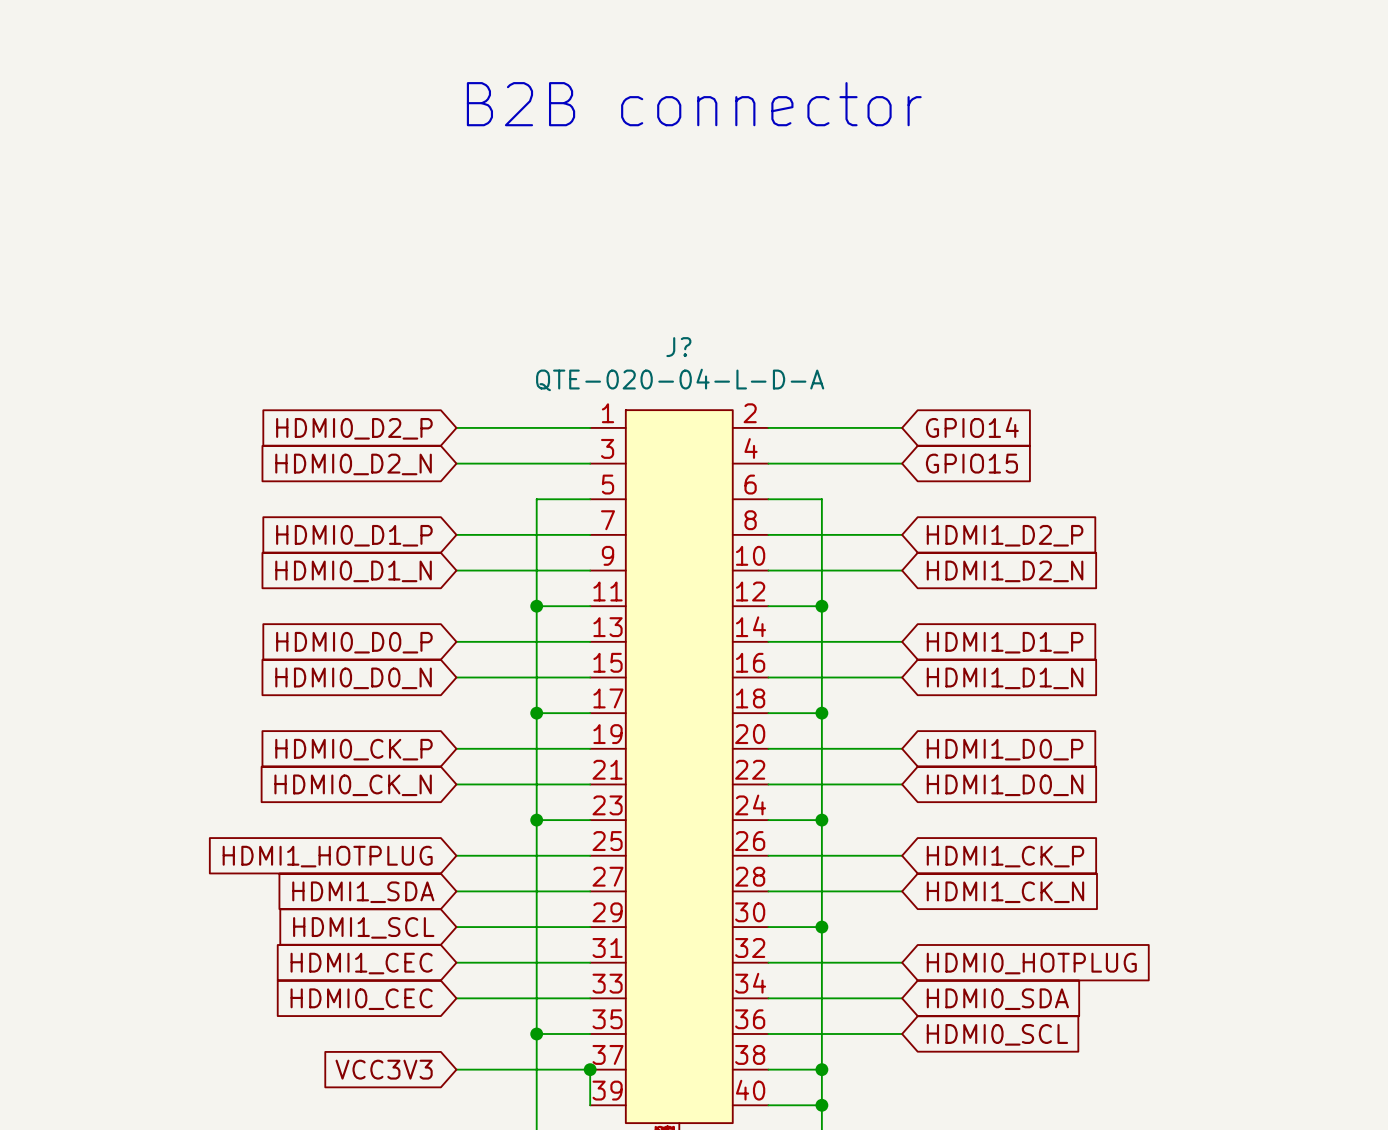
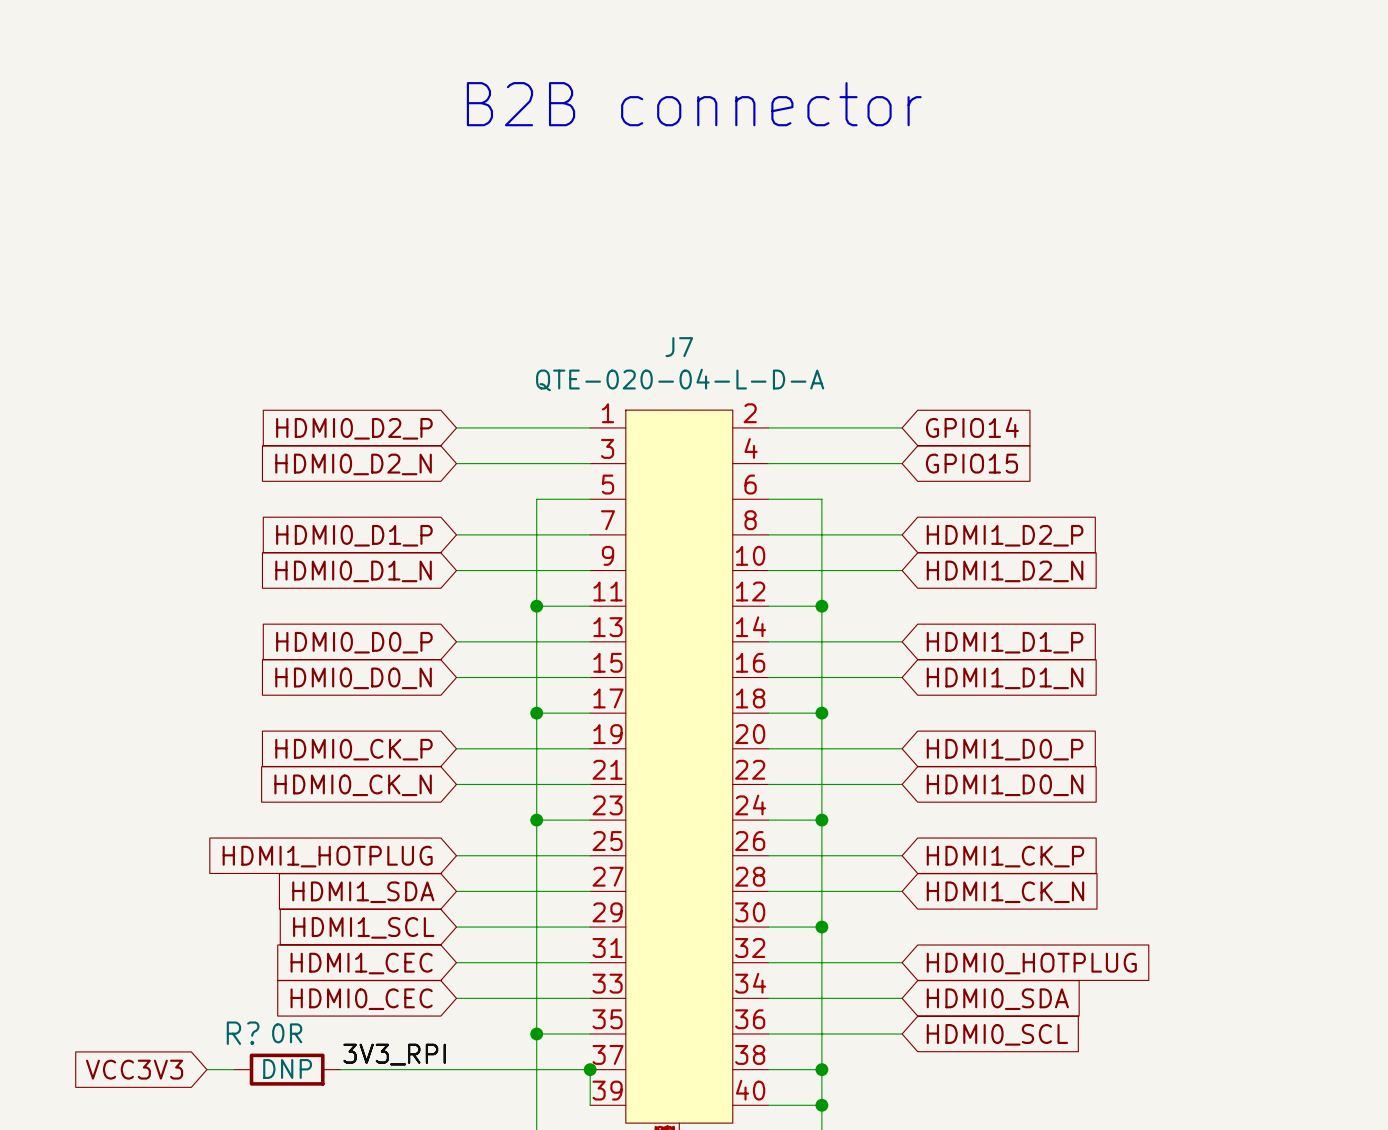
J? name: J? (678, 347) -> J7 (679, 347)
label: none -> 3V3_RPI (394, 1054)
wire: none -> (206, 1069) (233, 1069)
R?: none -> (287, 1069)
wire: none -> (340, 1069) (456, 1069)
global label position: VCC3V3 (384, 1069) -> VCC3V3 (134, 1069)

